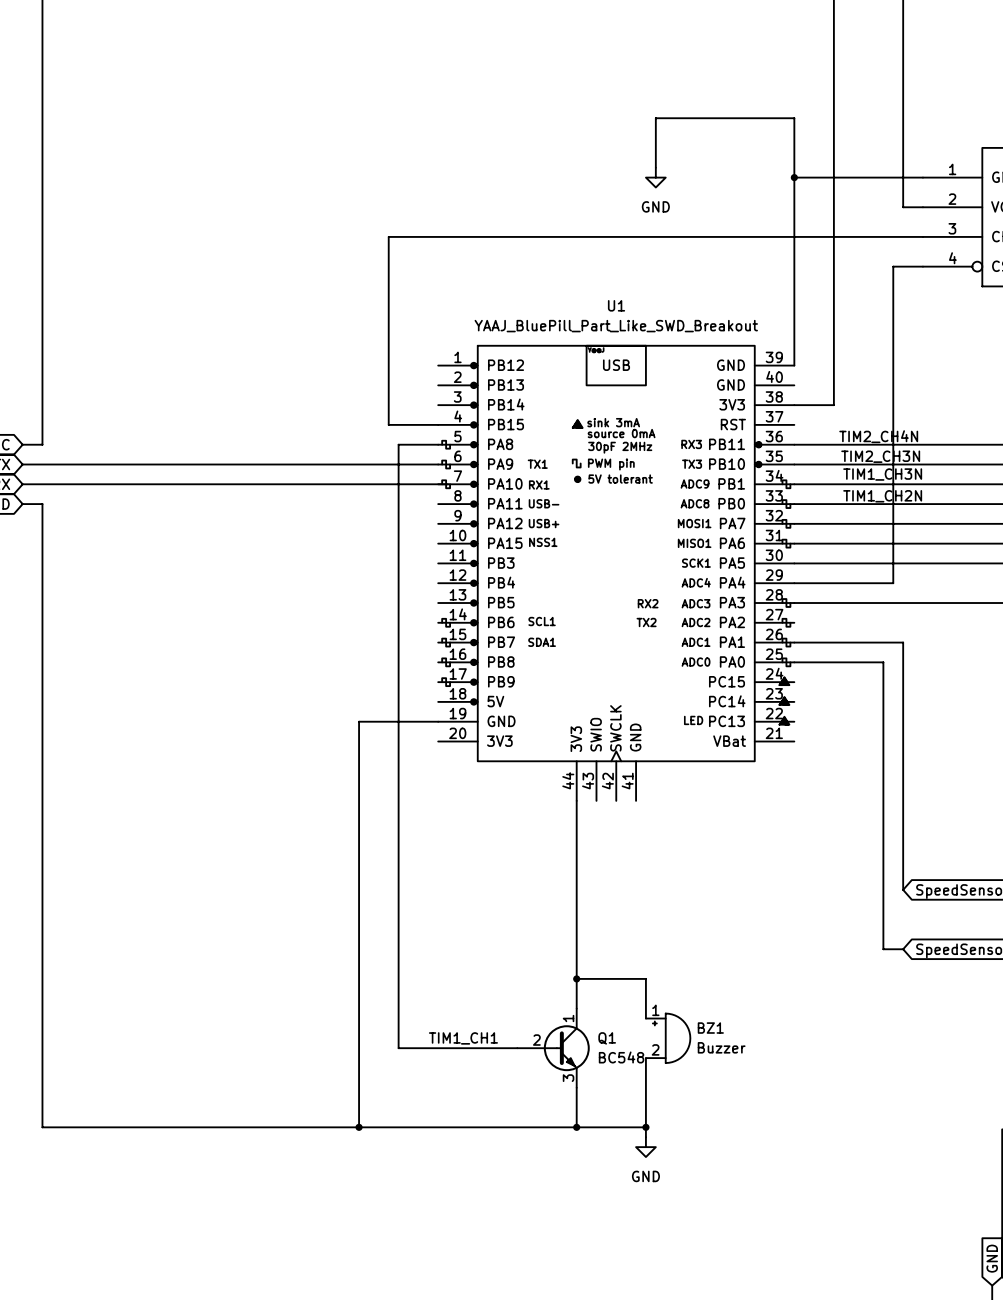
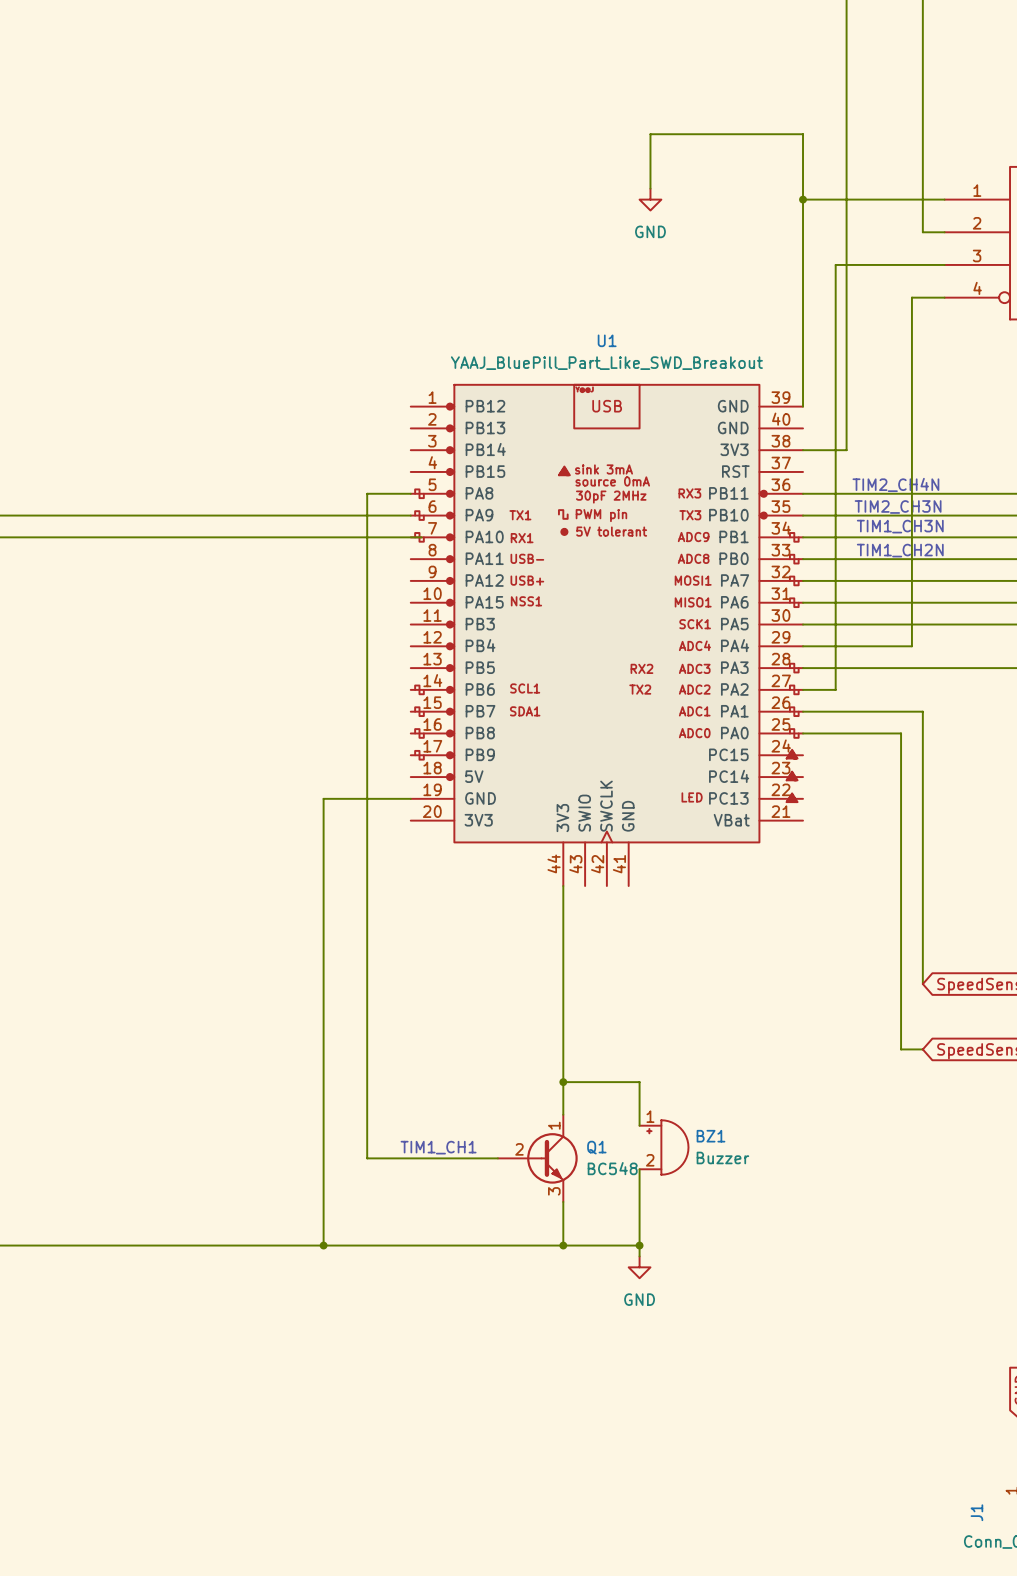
wire: (824, 236) (388, 236) (388, 424) (438, 424) -> (835, 264) (835, 689) (803, 689)

